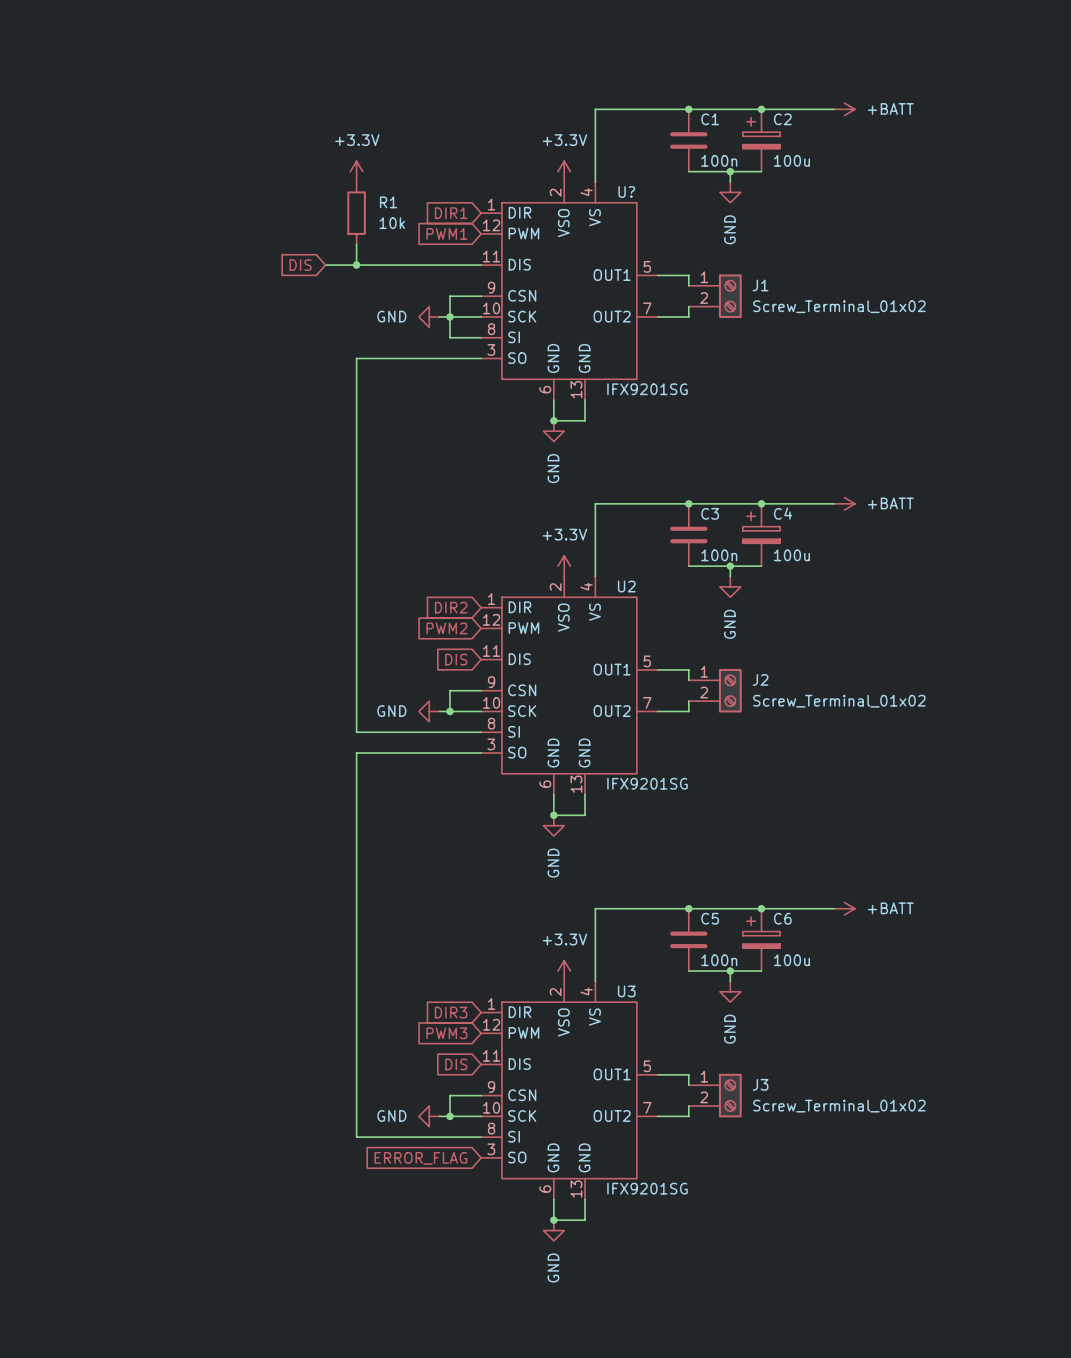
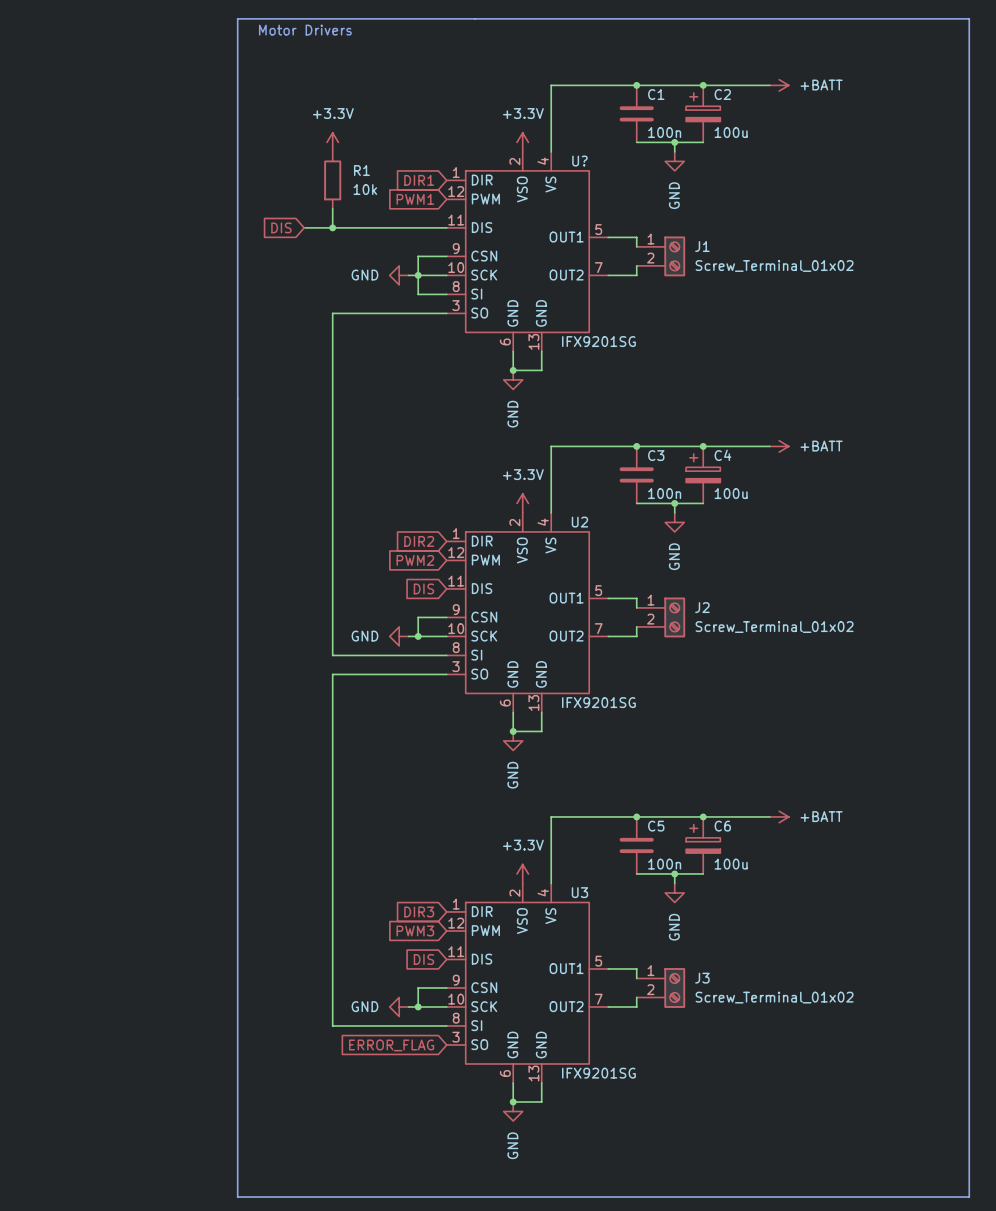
line: none -> (237, 18) (969, 18) (969, 1197) (237, 1197) (237, 18)
text: none -> Motor Drivers (305, 30)

